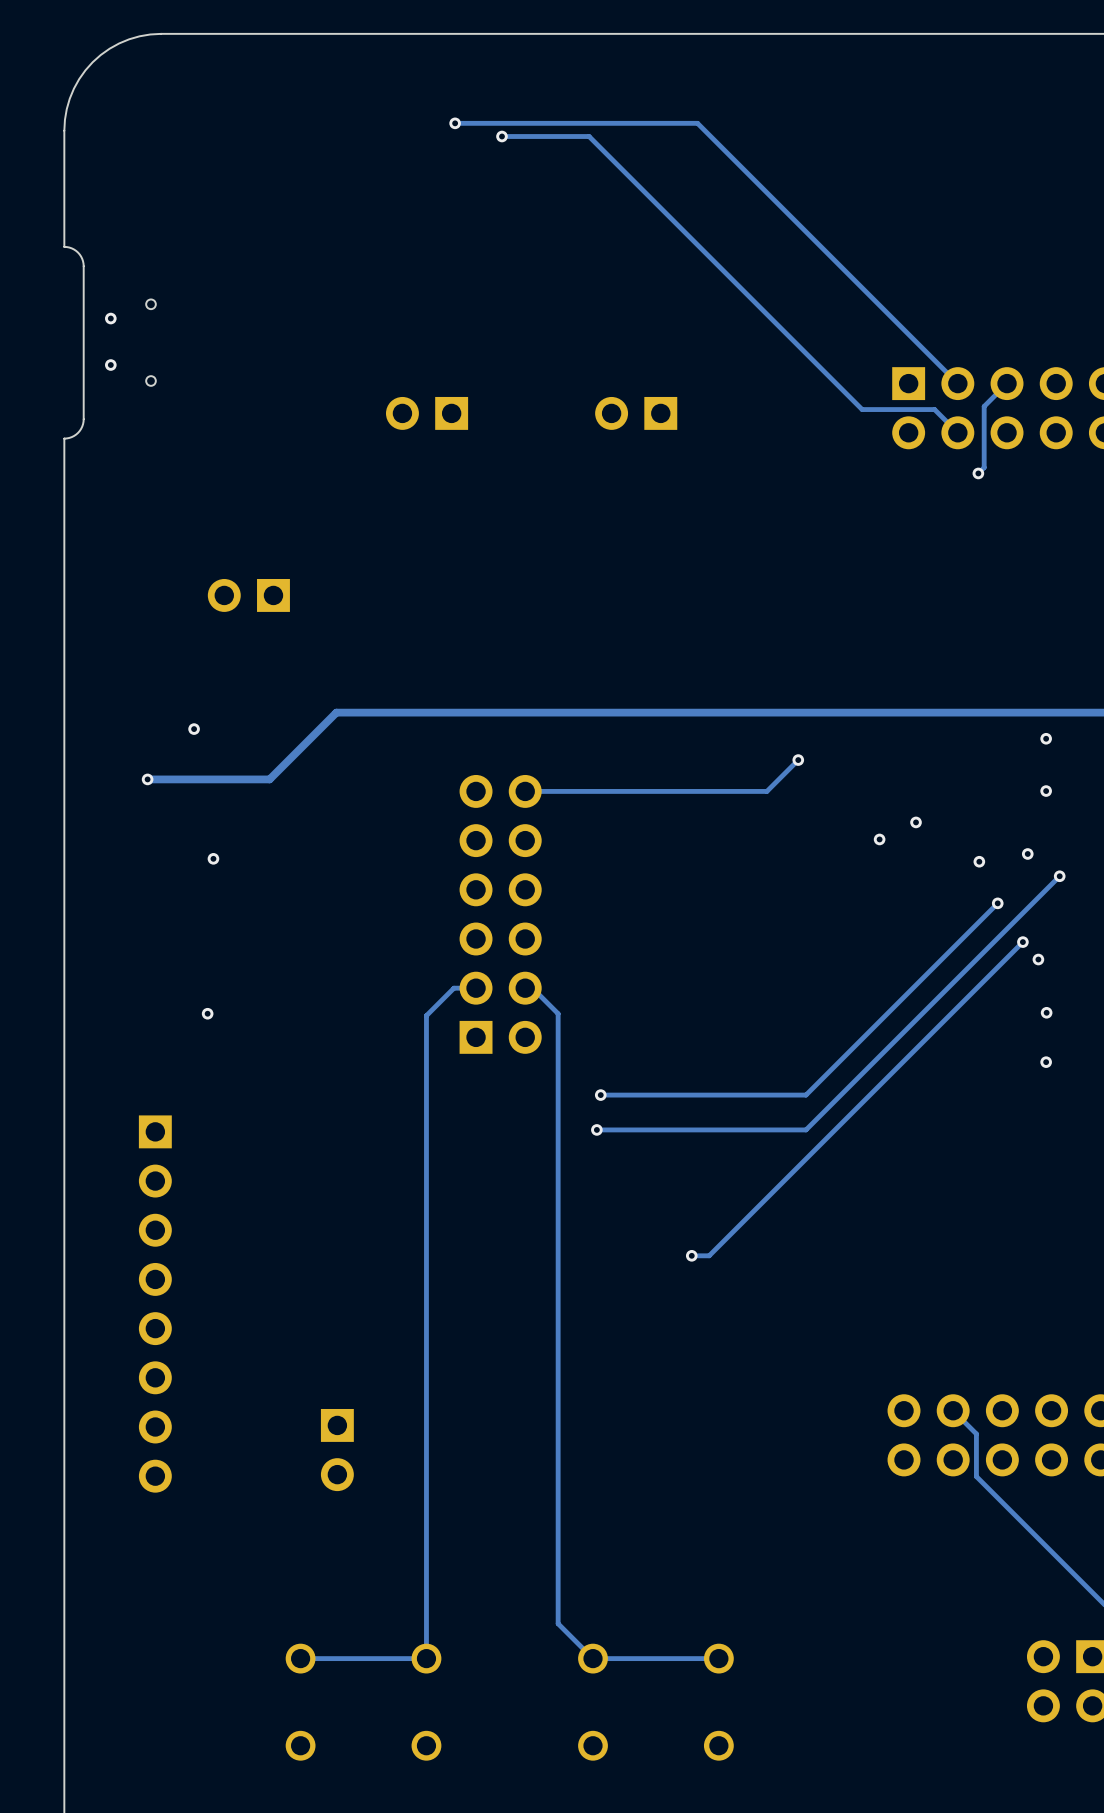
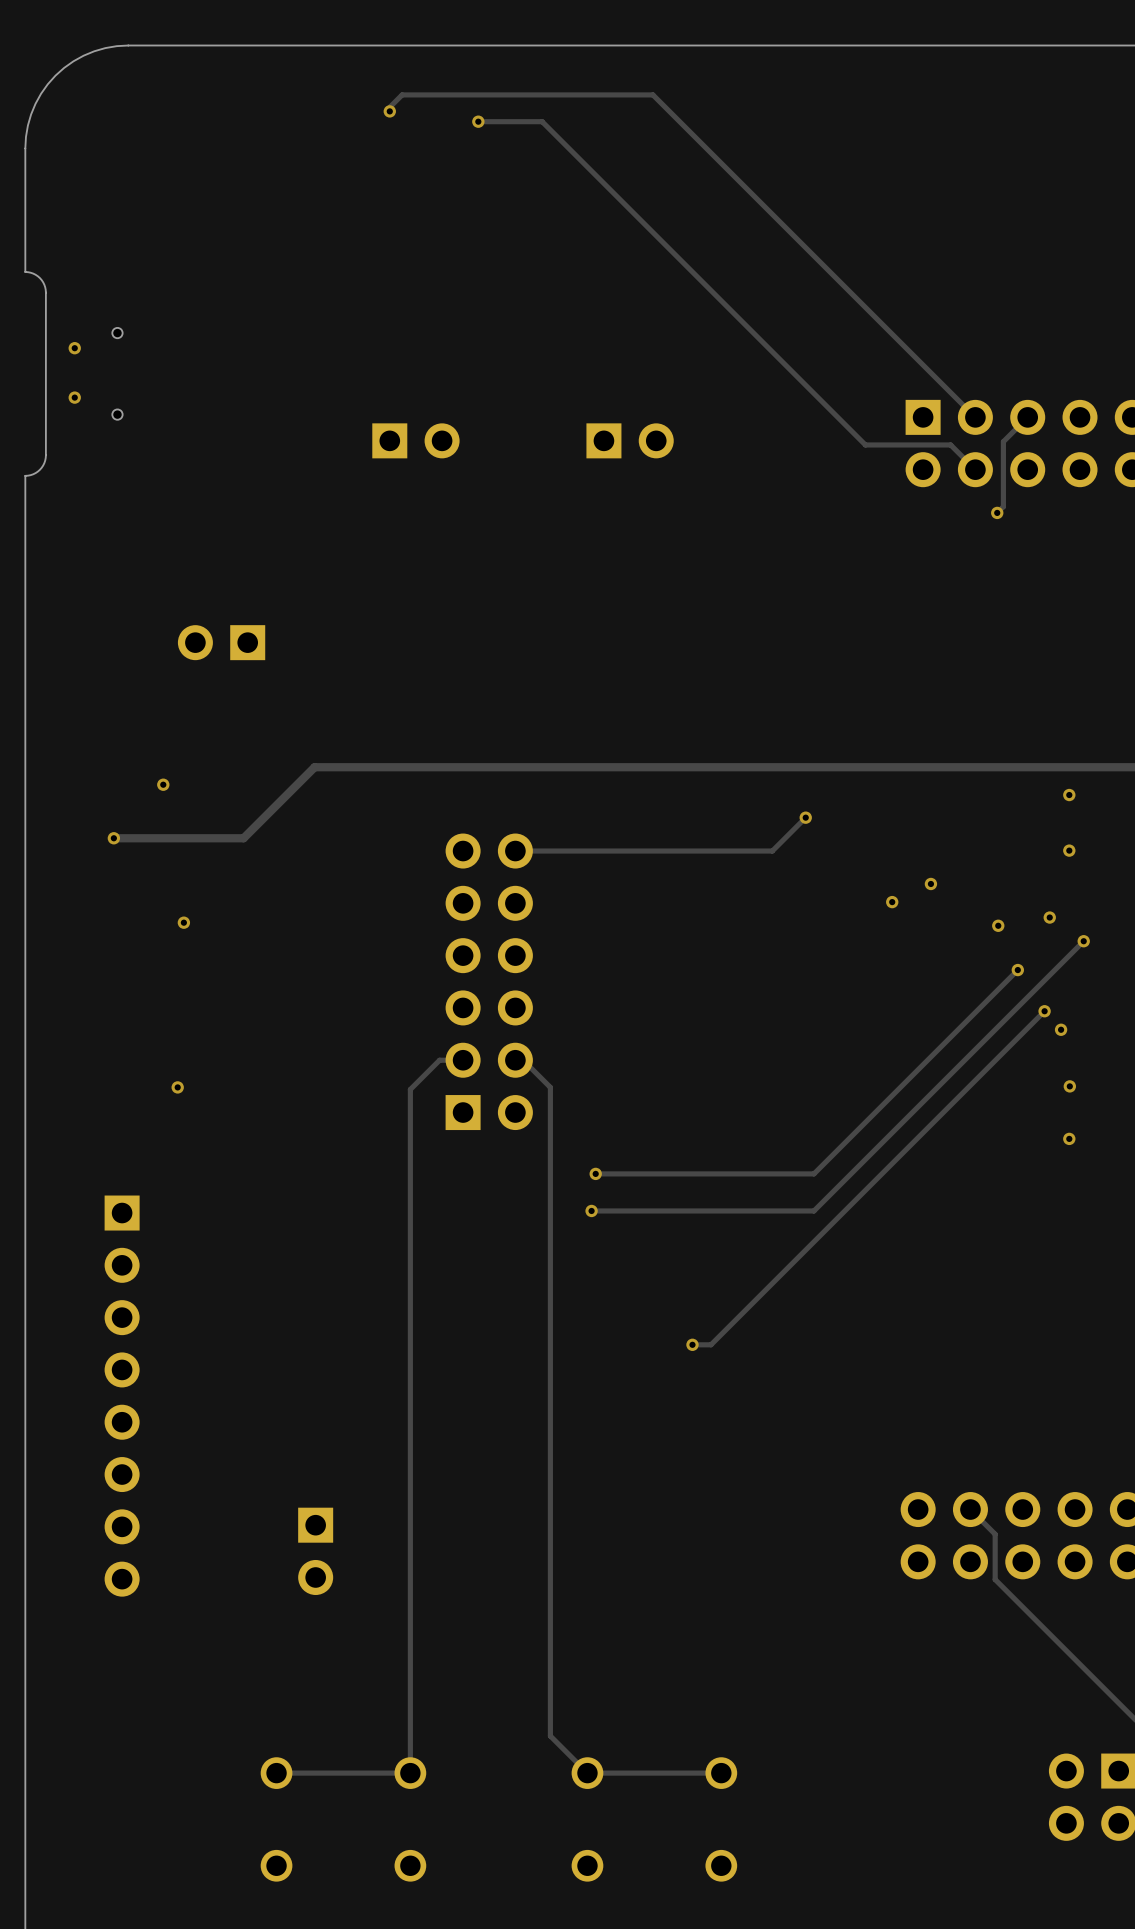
via: none -> (389, 111)
via: none -> (478, 121)
via: (455, 123) -> none
track: (697, 123) (455, 123) -> (698, 140) (652, 94) (402, 94) (389, 107) (389, 111)
track: (501, 136) (589, 136) (862, 409) -> (478, 121) (542, 121) (865, 444) (873, 444)
via: (501, 136) -> none
part rotation: 0° (427, 413) -> 180° (415, 440)
part rotation: 0° (636, 413) -> 180° (630, 440)

